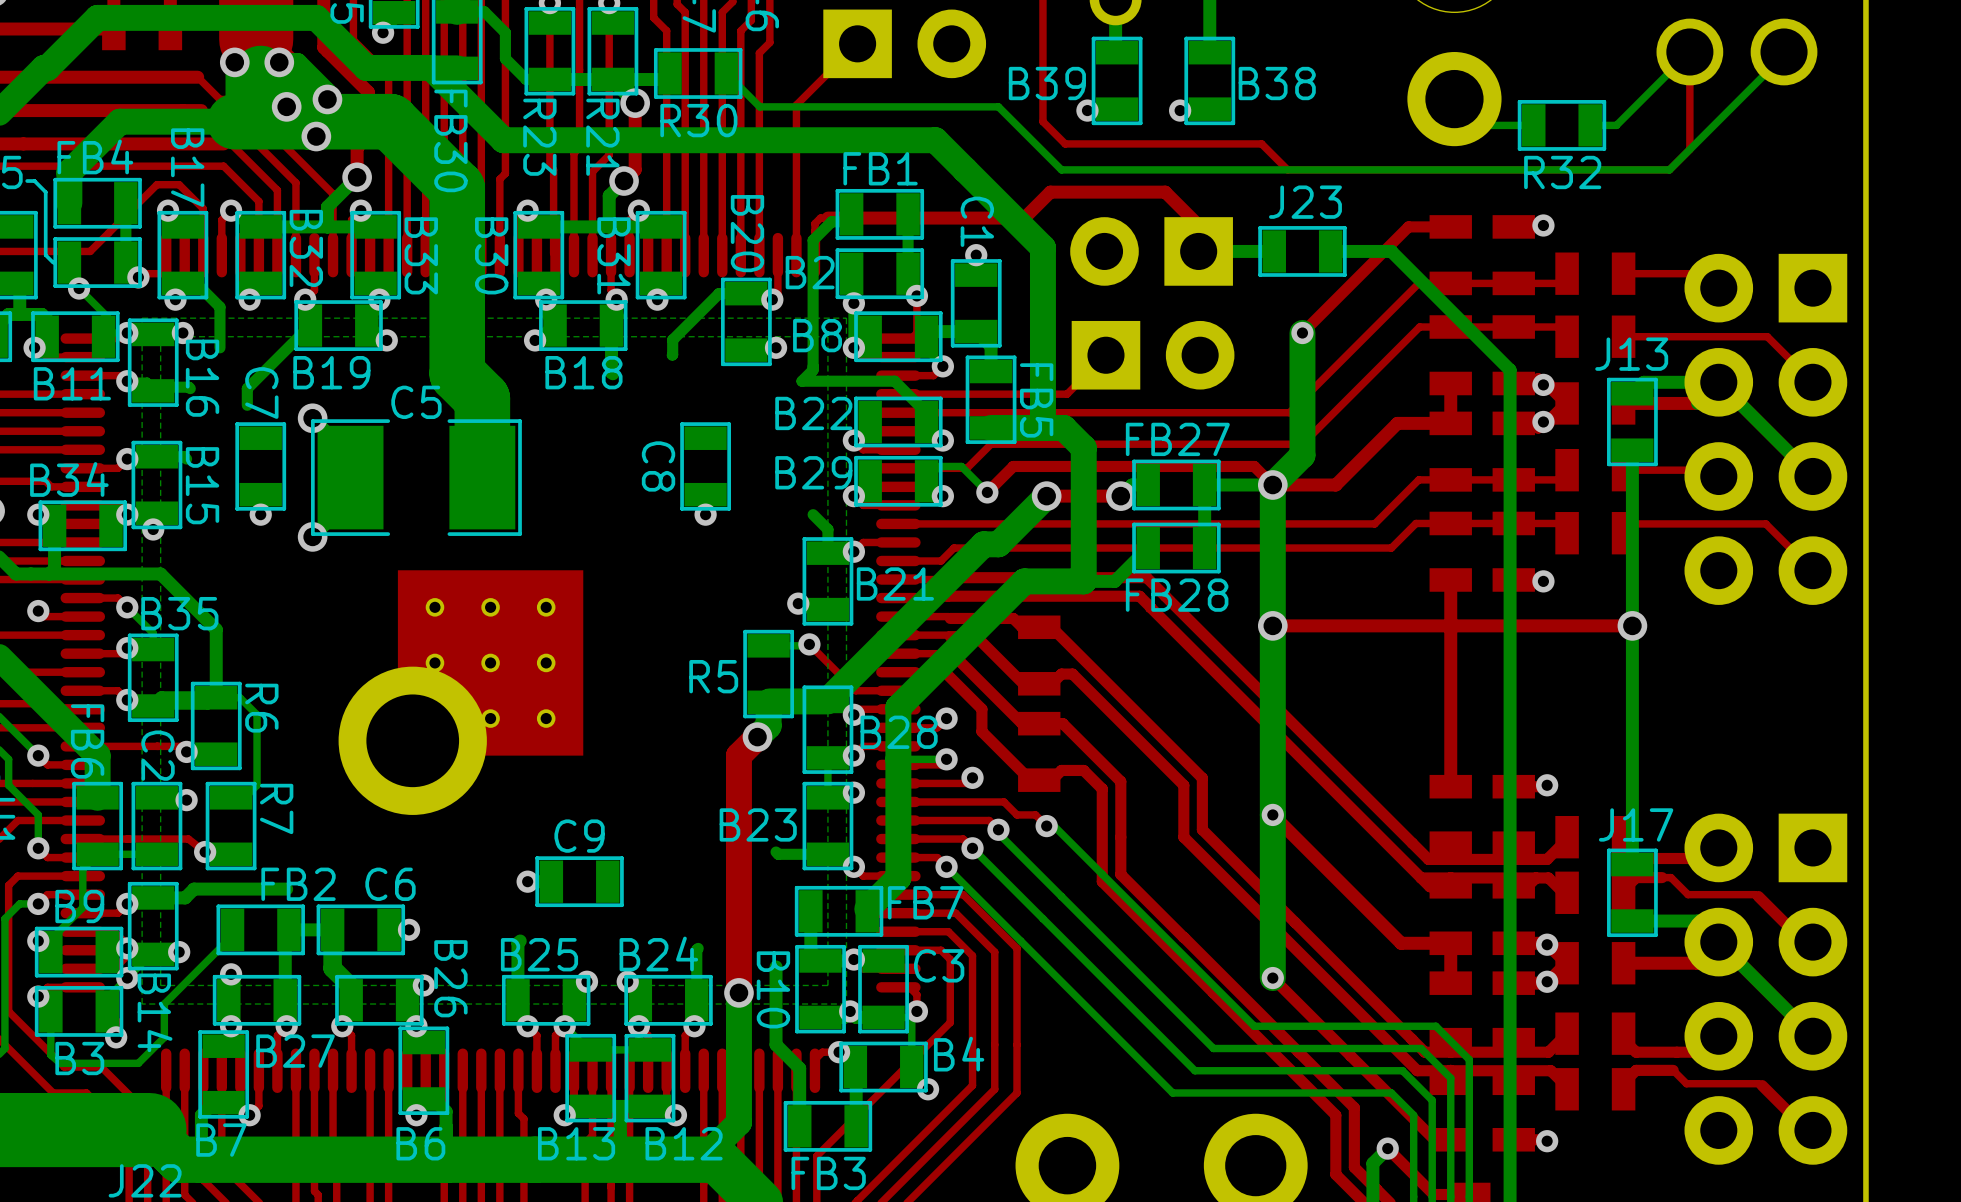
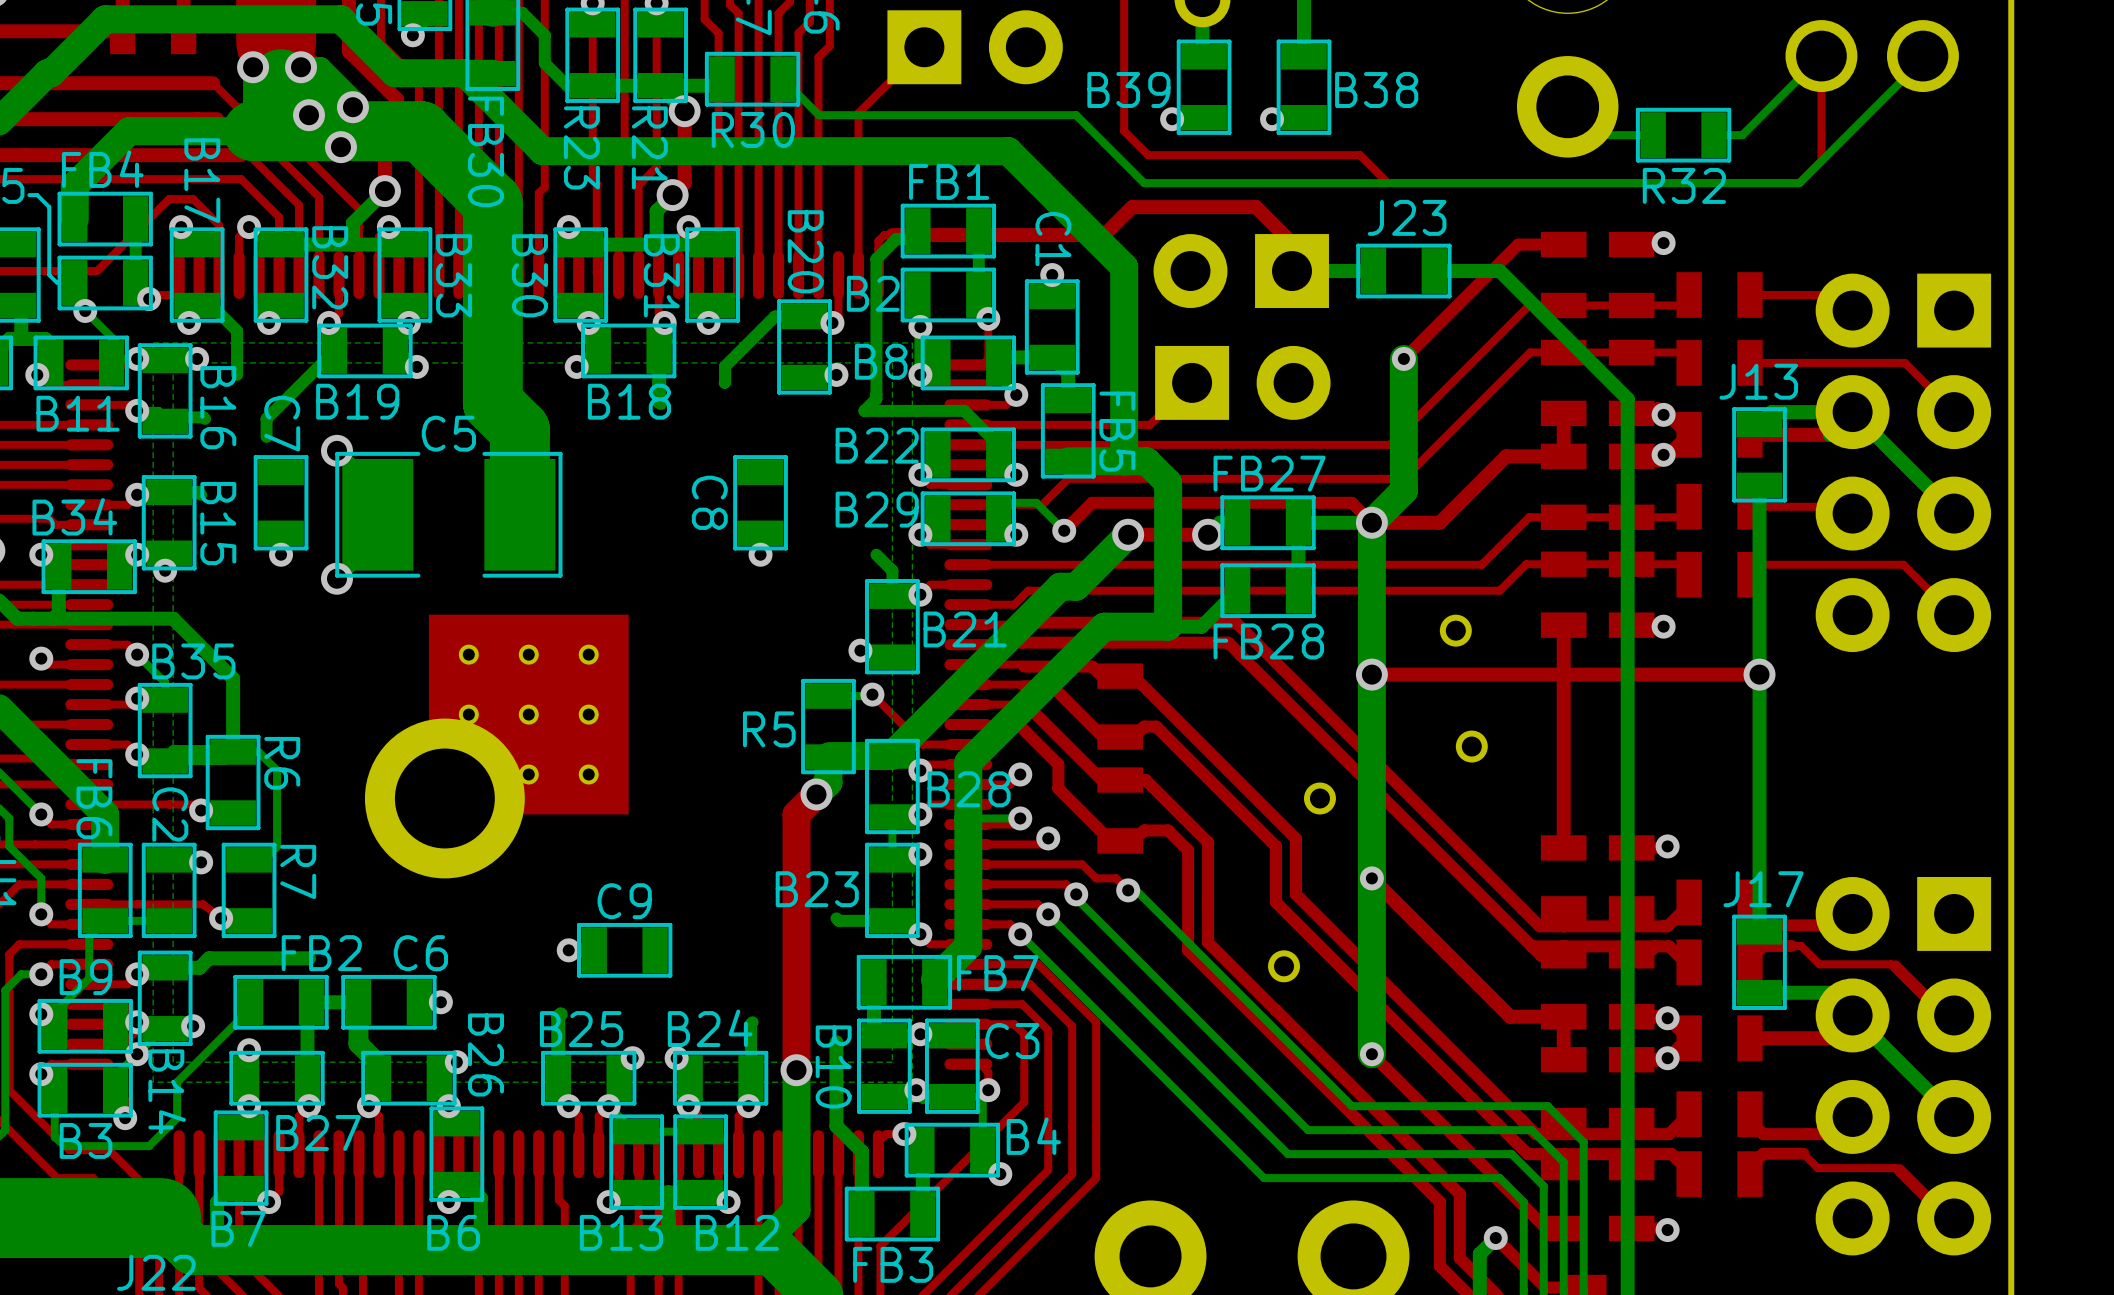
part: none -> (1455, 630)
part: none -> (1471, 746)
part: none -> (1319, 798)
part: none -> (1284, 966)

